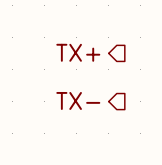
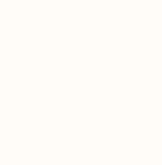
hierarchical label: TX+ (78, 52) -> none
hierarchical label: TX- (78, 100) -> none

